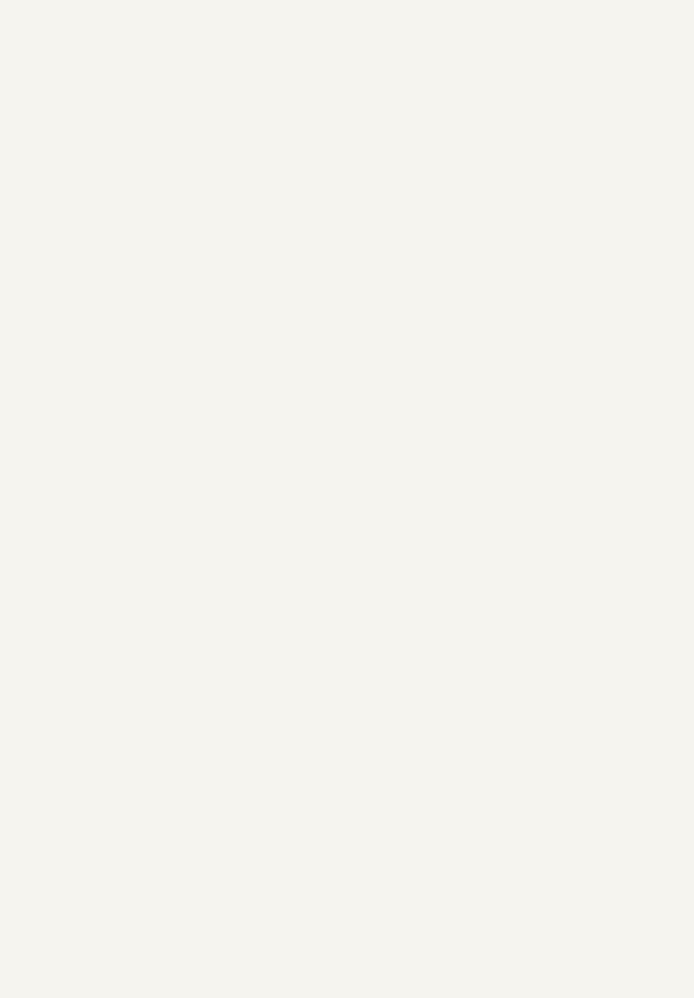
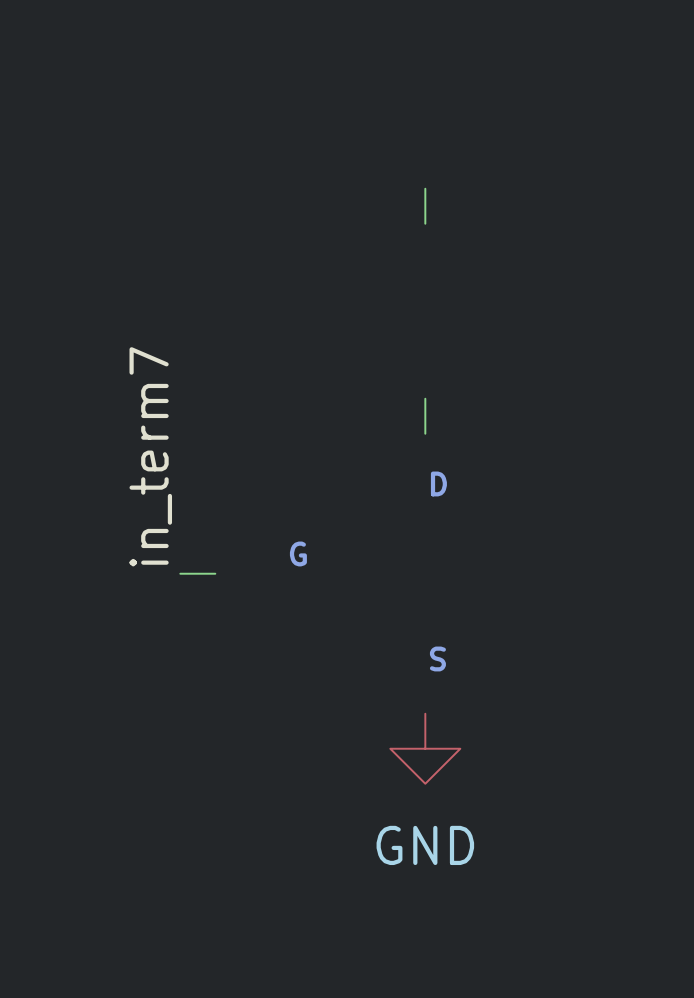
wire: none -> (425, 188) (425, 223)
wire: none -> (425, 398) (425, 433)
label: none -> in_term7 (150, 456)
text: none -> D (438, 483)
text: none -> G (298, 553)
wire: none -> (180, 573) (215, 573)
text: none -> S (437, 658)
power symbol: none -> GND (425, 748)

